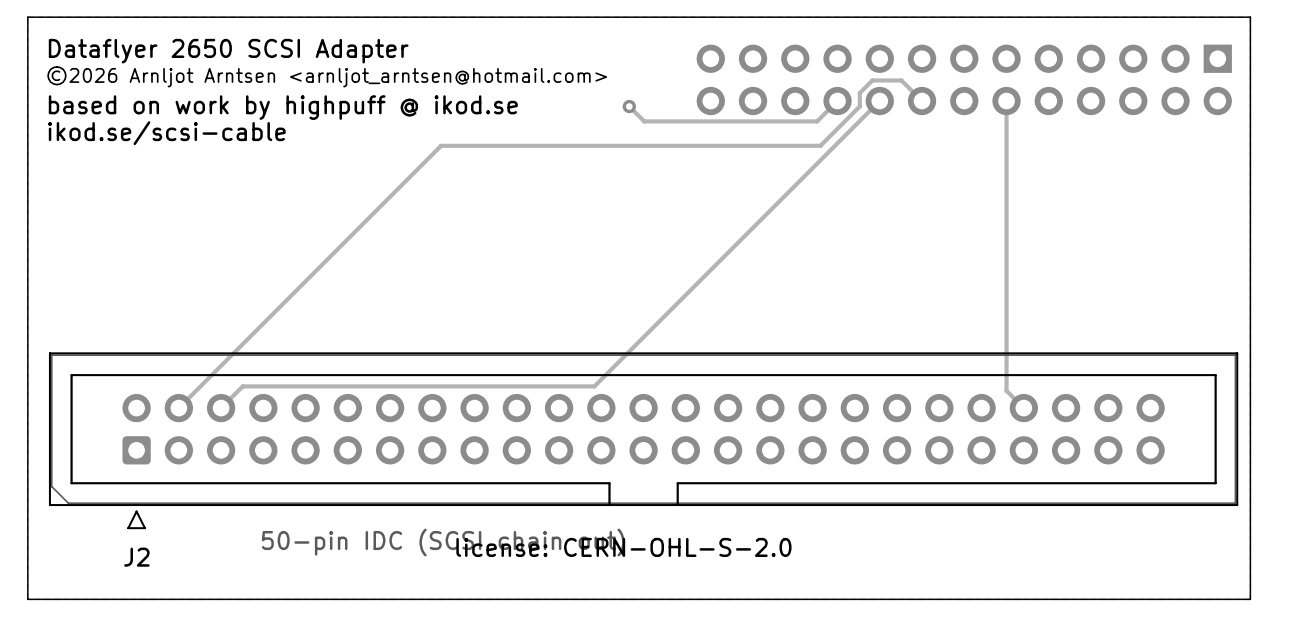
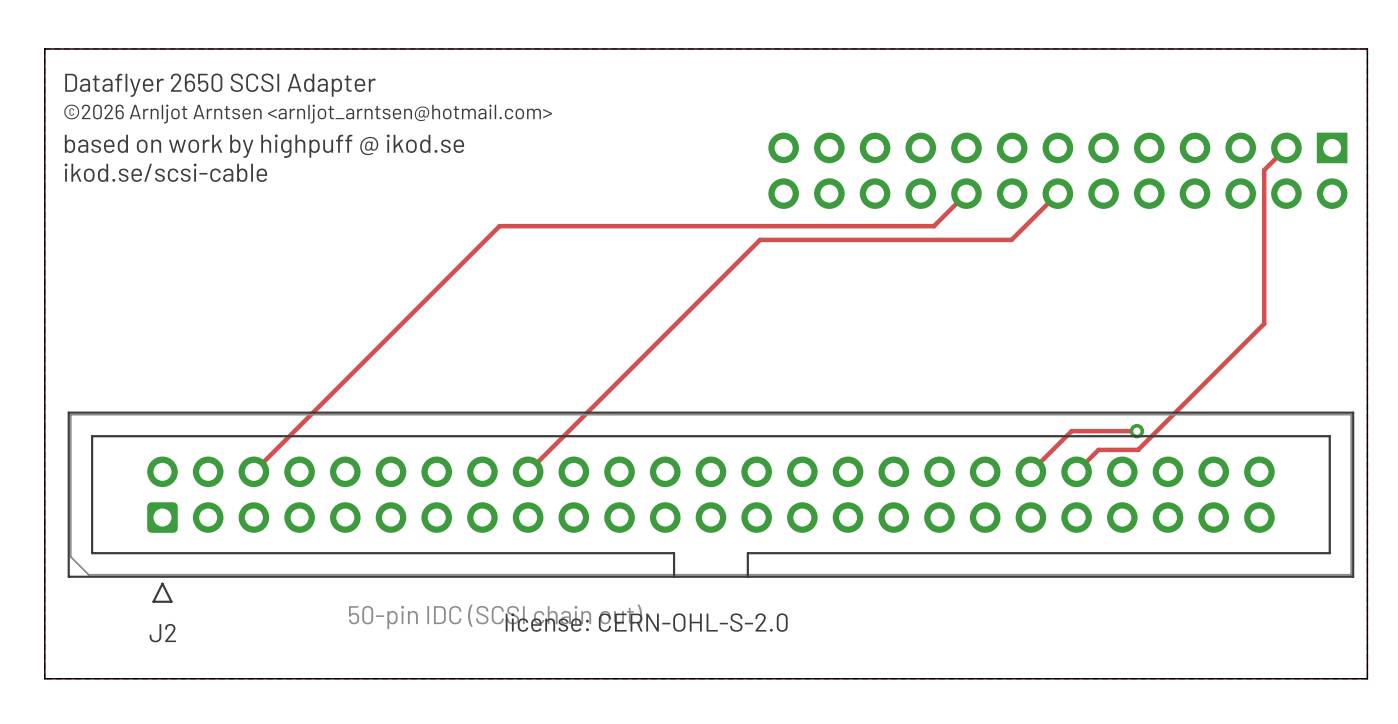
part position: (964, 79) -> (1057, 170)
track: (837, 101) (817, 121) (644, 121) (629, 106) -> none
track: (879, 101) (594, 386) (242, 386) -> (966, 193) (933, 226) (499, 226) (277, 448)
track: (922, 101) (901, 80) (872, 80) (859, 93) (859, 106) (820, 145) (441, 145) (178, 408) -> none
track: (1006, 101) (1006, 390) (1023, 408) -> none
via: (629, 106) -> none
track: none -> (1286, 147) (1264, 170) (1264, 323) (1138, 449) (1098, 449) (1076, 471)
track: none -> (1057, 193) (1011, 239) (760, 239) (528, 471)
track: none -> (1136, 431) (1071, 431) (1030, 471)
via: none -> (1136, 431)

